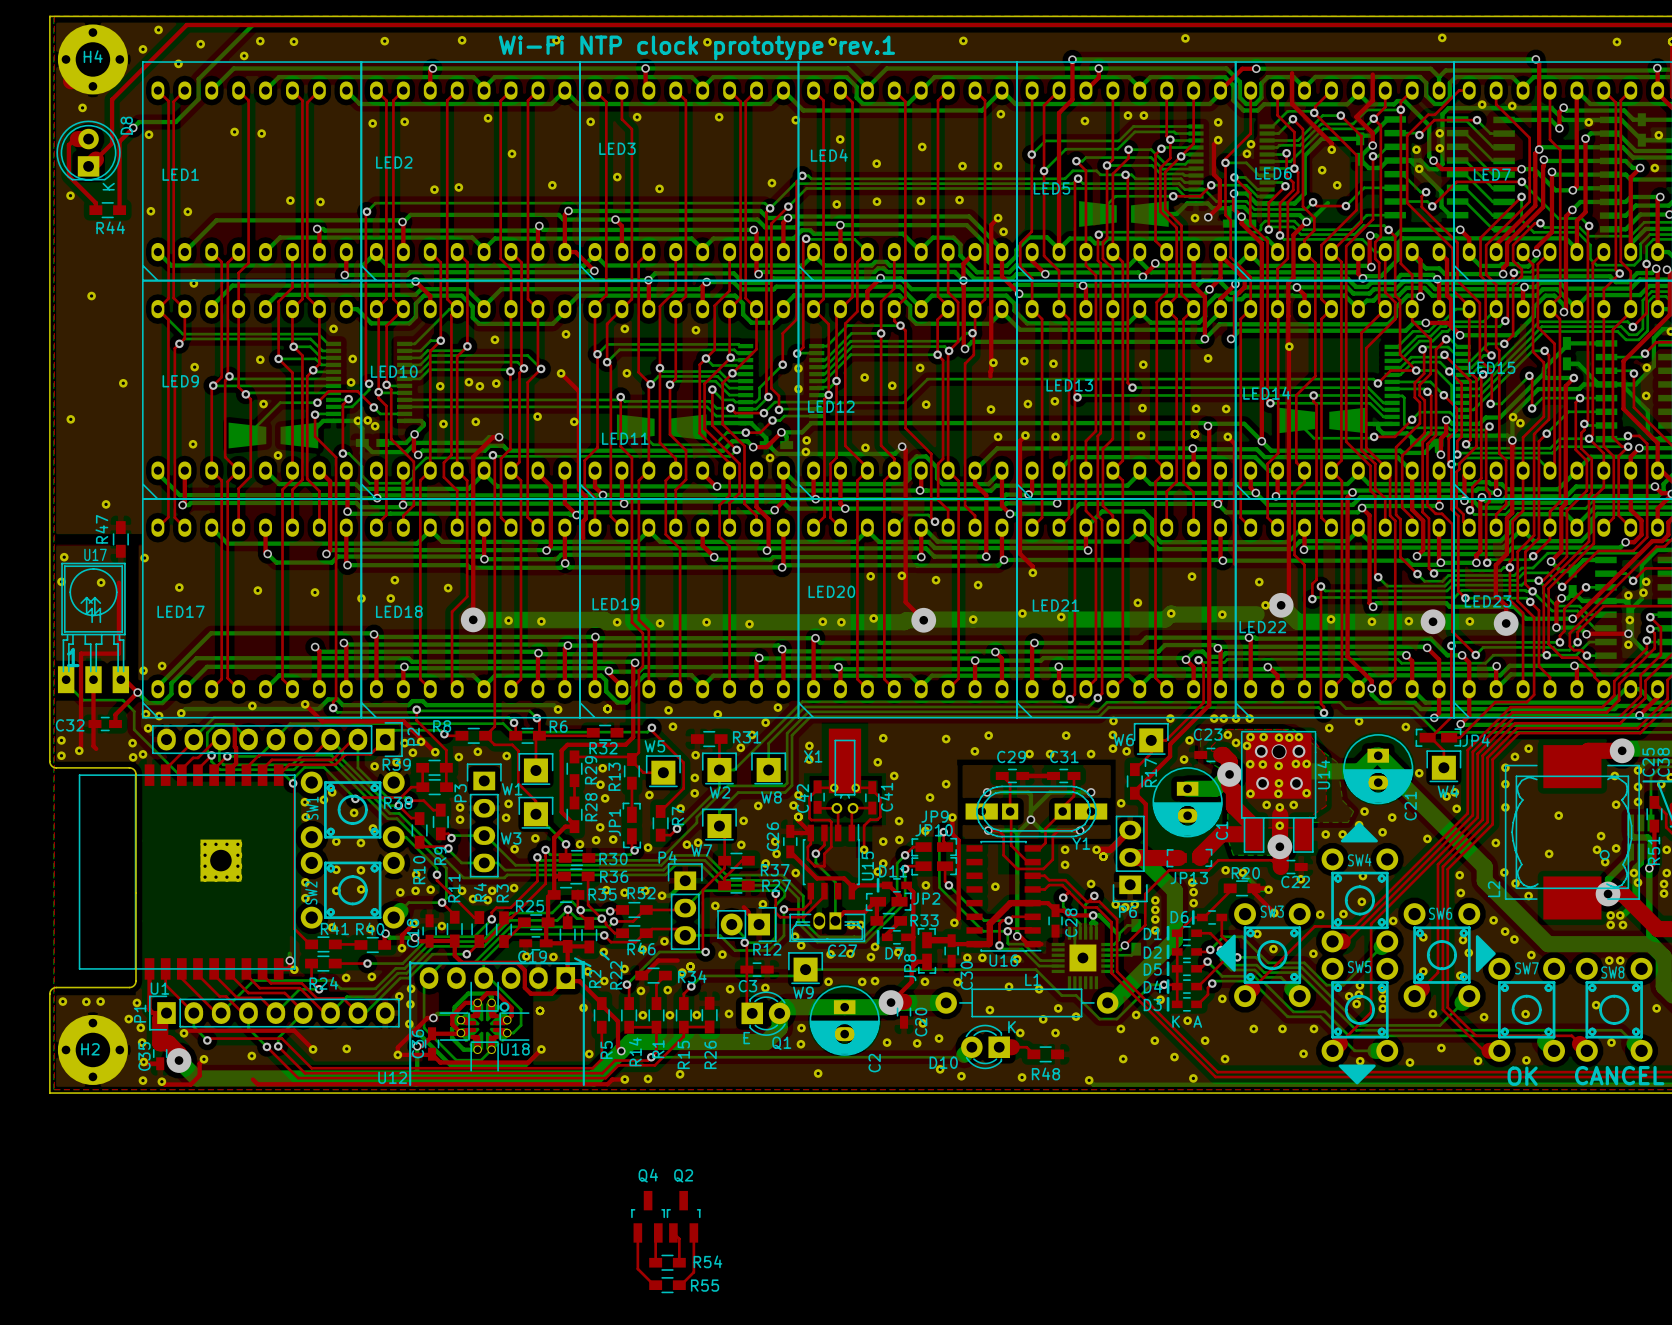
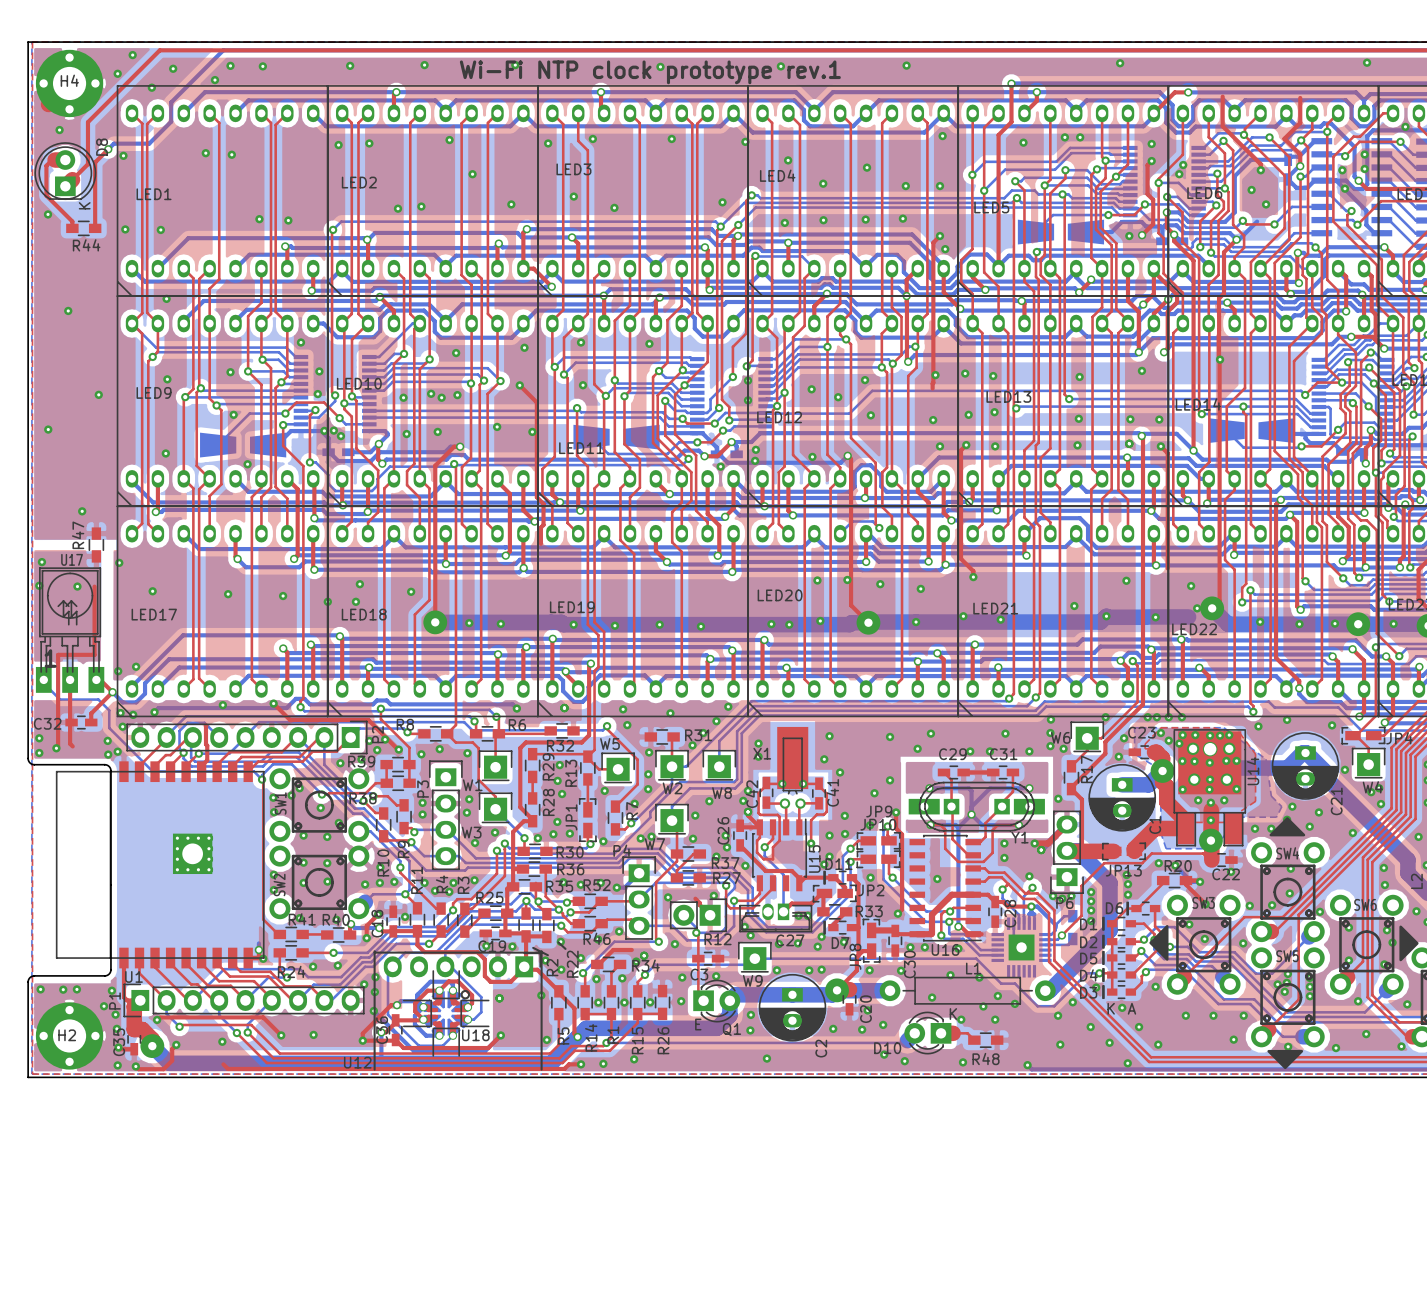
Q4: (648, 1216) -> none
Q2: (683, 1216) -> none
top track: (637, 1232) (637, 1268) (655, 1285) -> none
top track: (658, 1232) (655, 1235) (655, 1262) -> none
top track: (673, 1232) (679, 1238) (679, 1262) -> none
top track: (693, 1232) (693, 1272) (679, 1285) -> none
R54: (667, 1262) -> none
R55: (667, 1285) -> none

